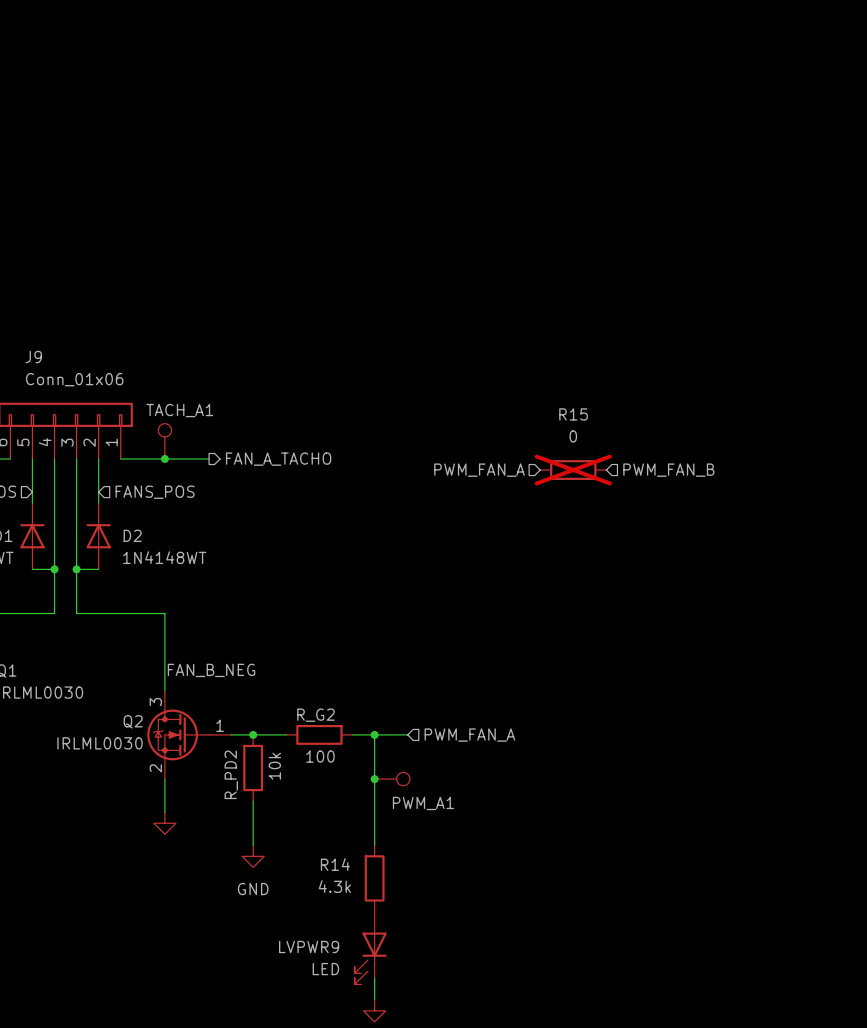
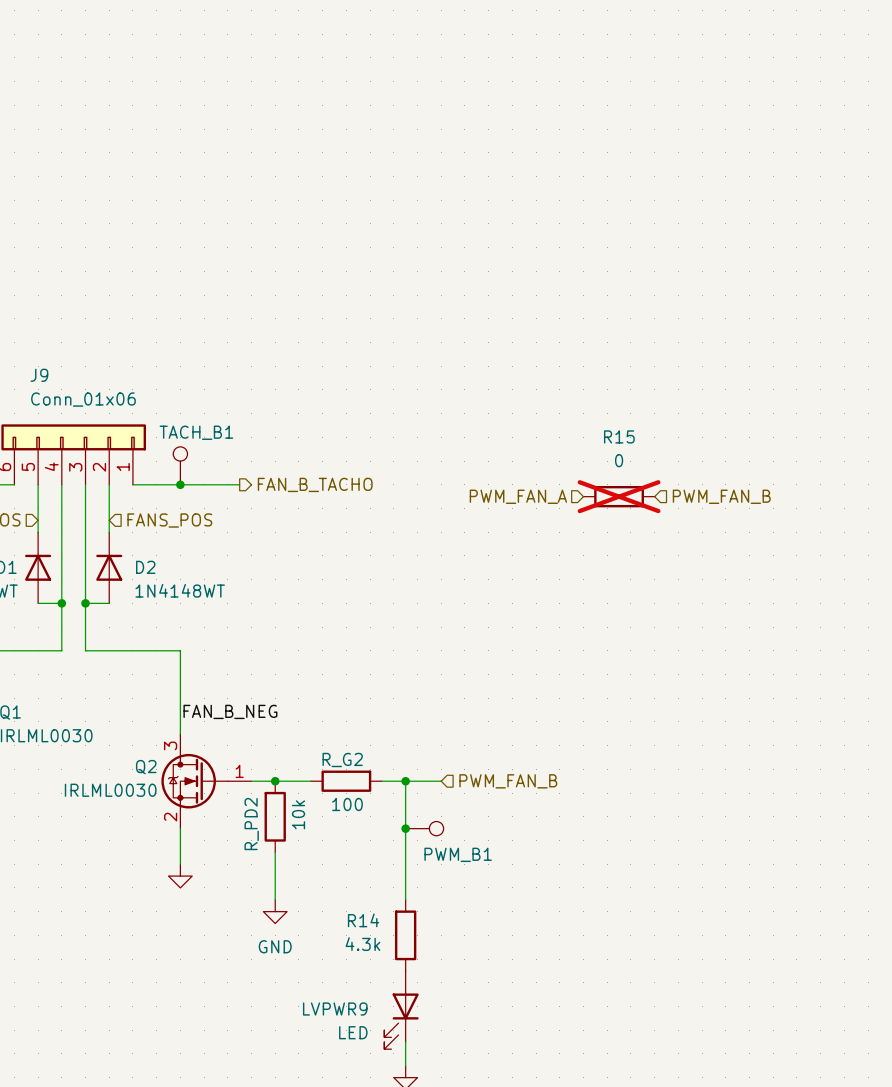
TACH_A1 name: TACH_A1 (179, 410) -> TACH_B1 (196, 432)
wire: none -> (227, 484) (239, 484)
hierarchical label: FAN_A_TACHO (278, 459) -> FAN_B_TACHO (315, 484)
hierarchical label: PWM_FAN_A (469, 735) -> PWM_FAN_B (508, 781)
PWM_A1 name: PWM_A1 (423, 803) -> PWM_B1 (458, 854)

